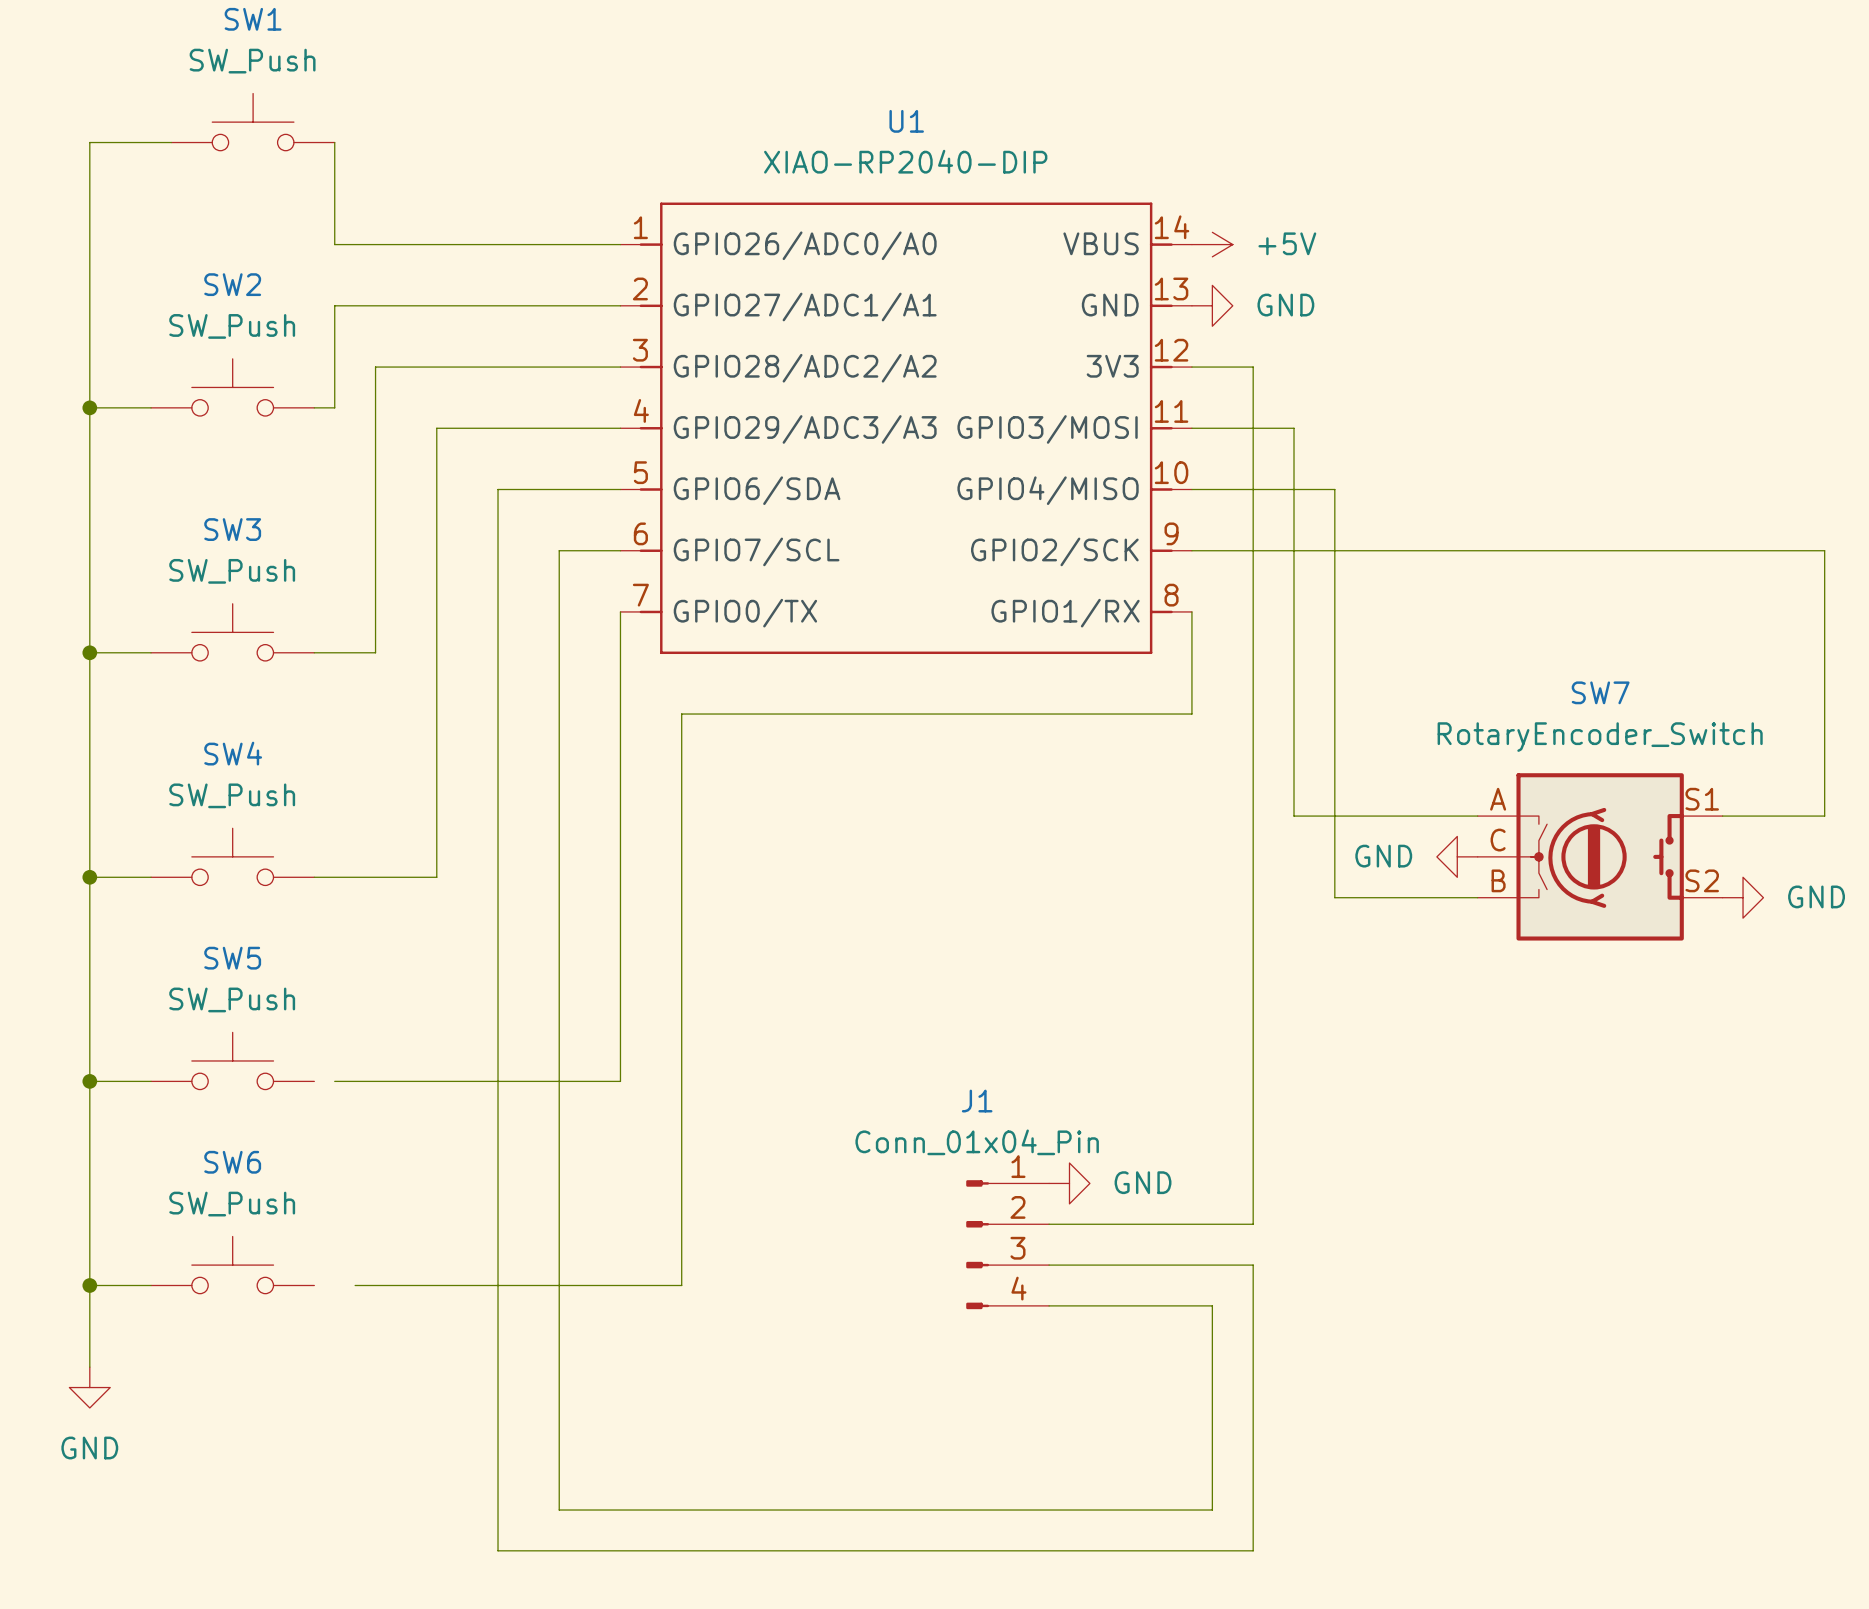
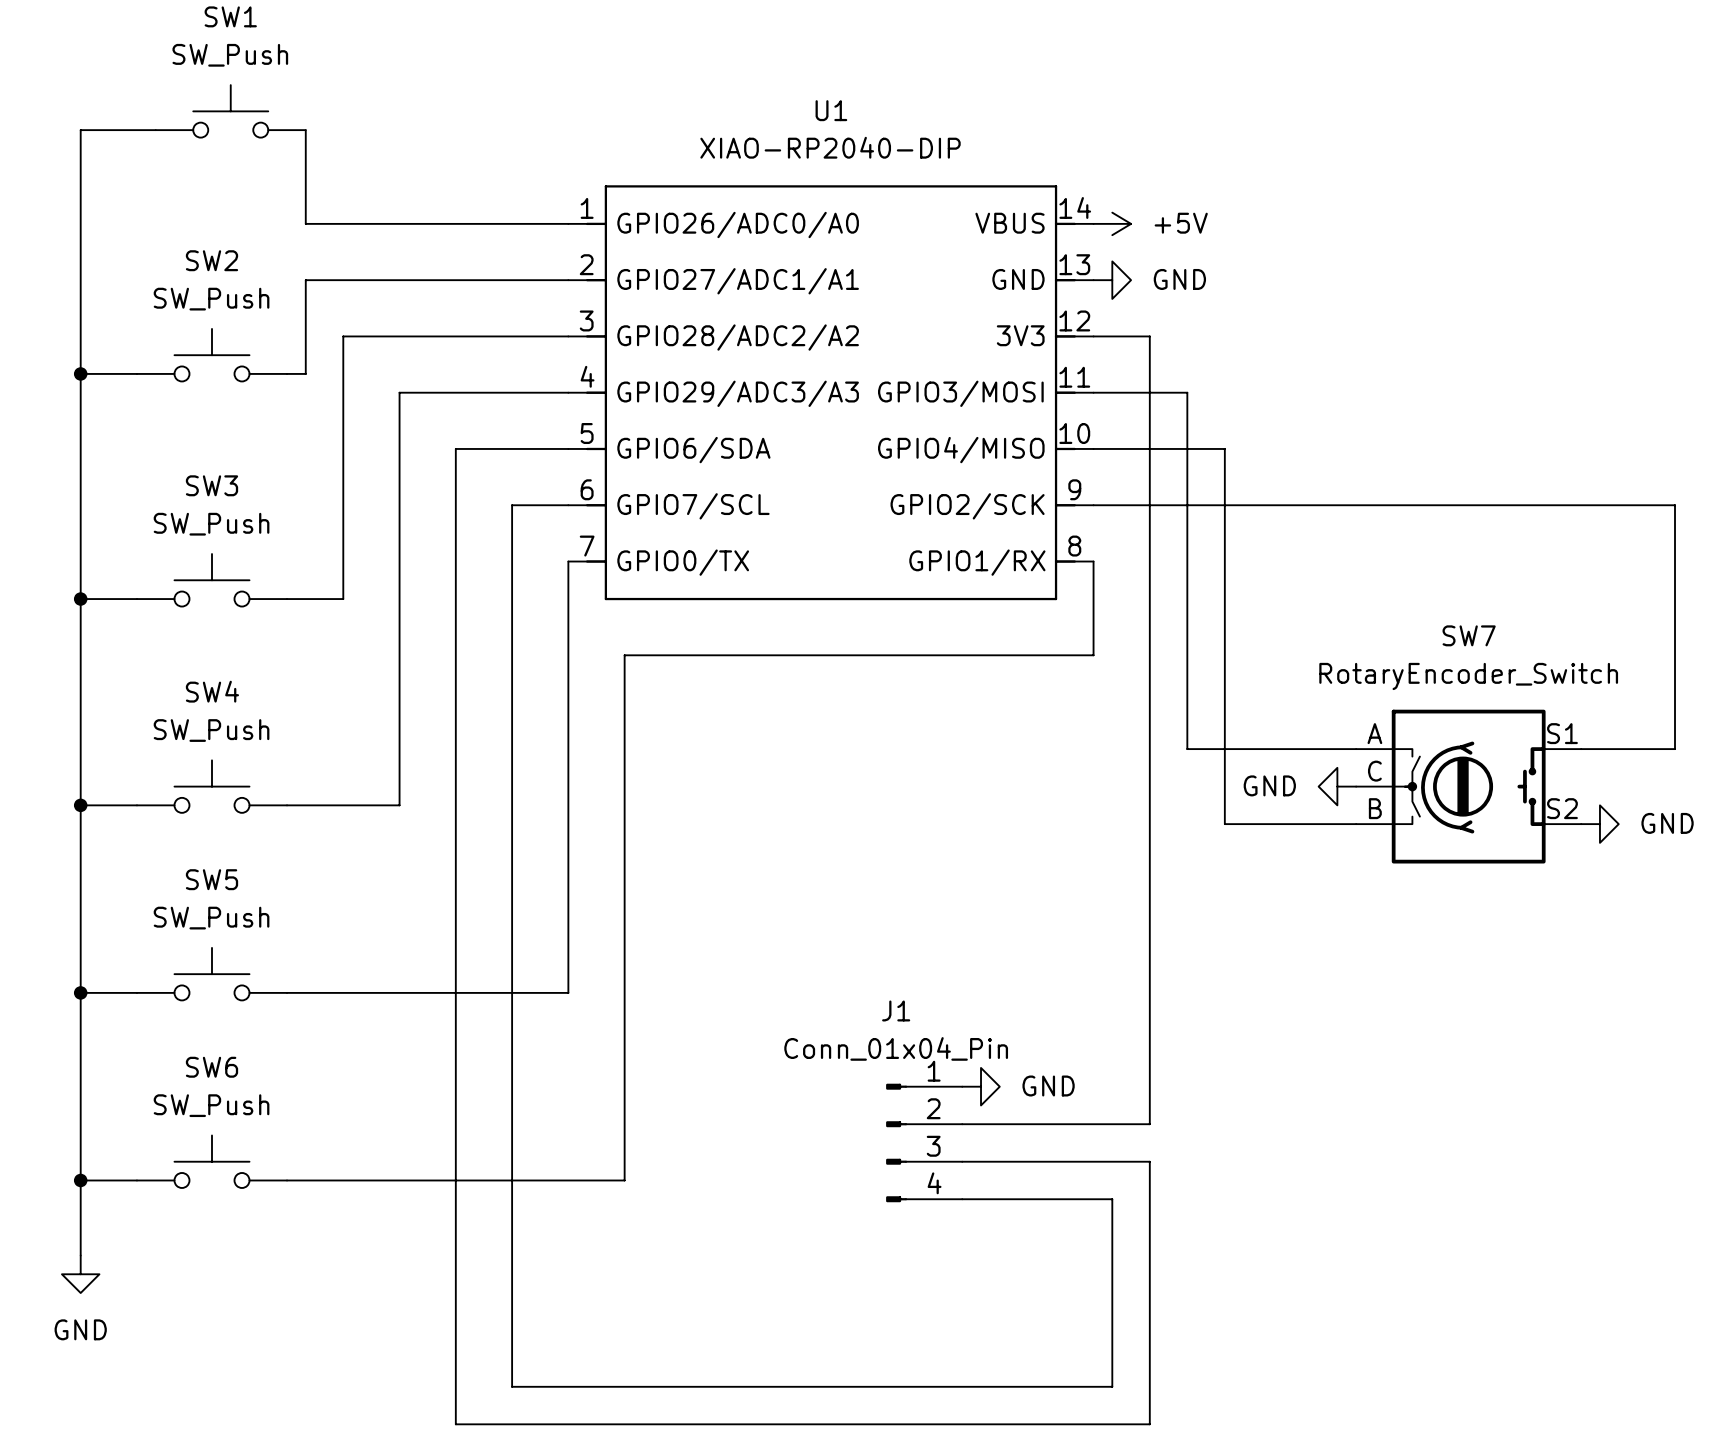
wire: none -> (287, 992) (305, 992)
wire: none -> (287, 1180) (324, 1180)

